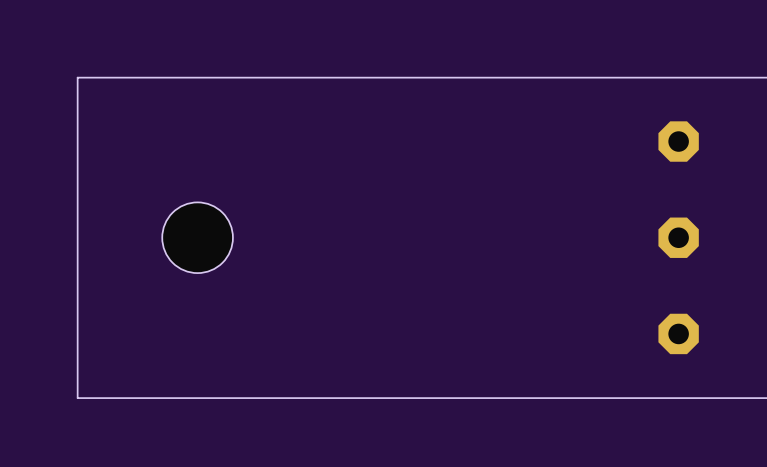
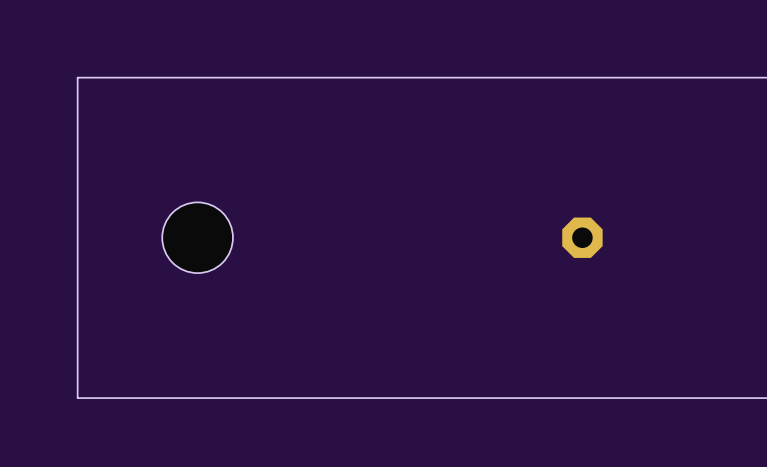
part: (678, 141) -> none
part: none -> (582, 237)
part: (678, 237) -> none
part: (678, 333) -> none

